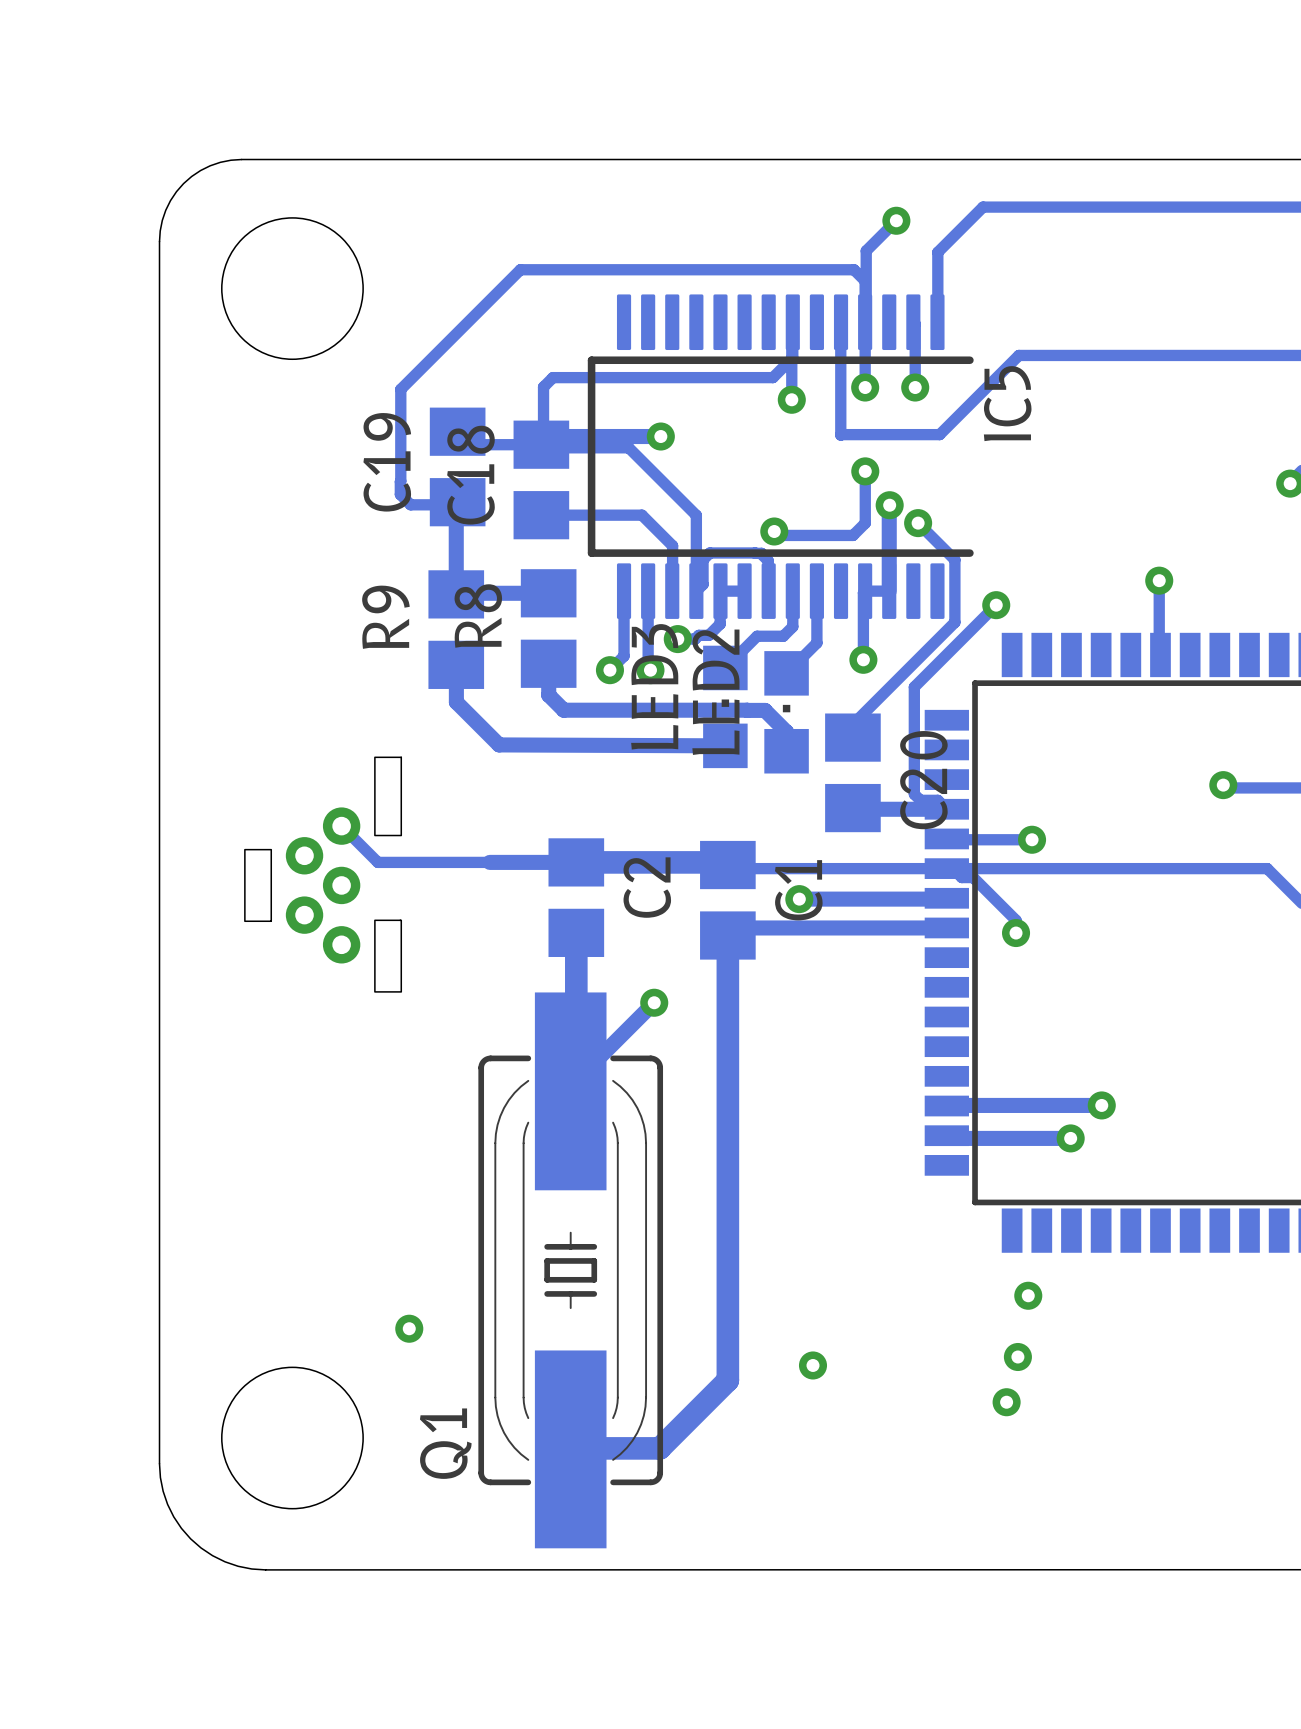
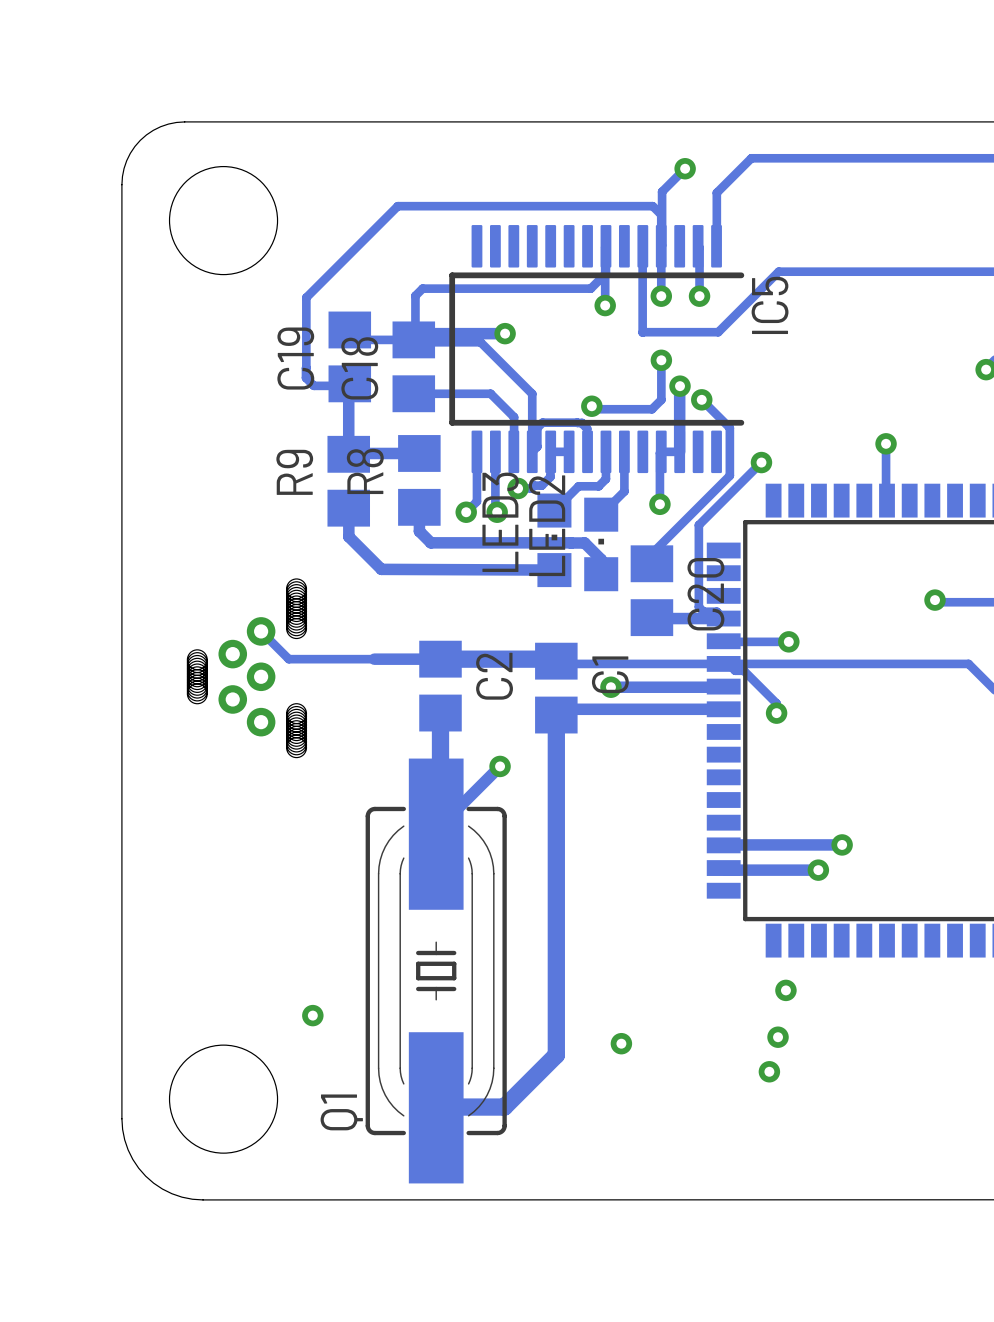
part footprint: [244, 756, 402, 993] -> [187, 578, 307, 758]

